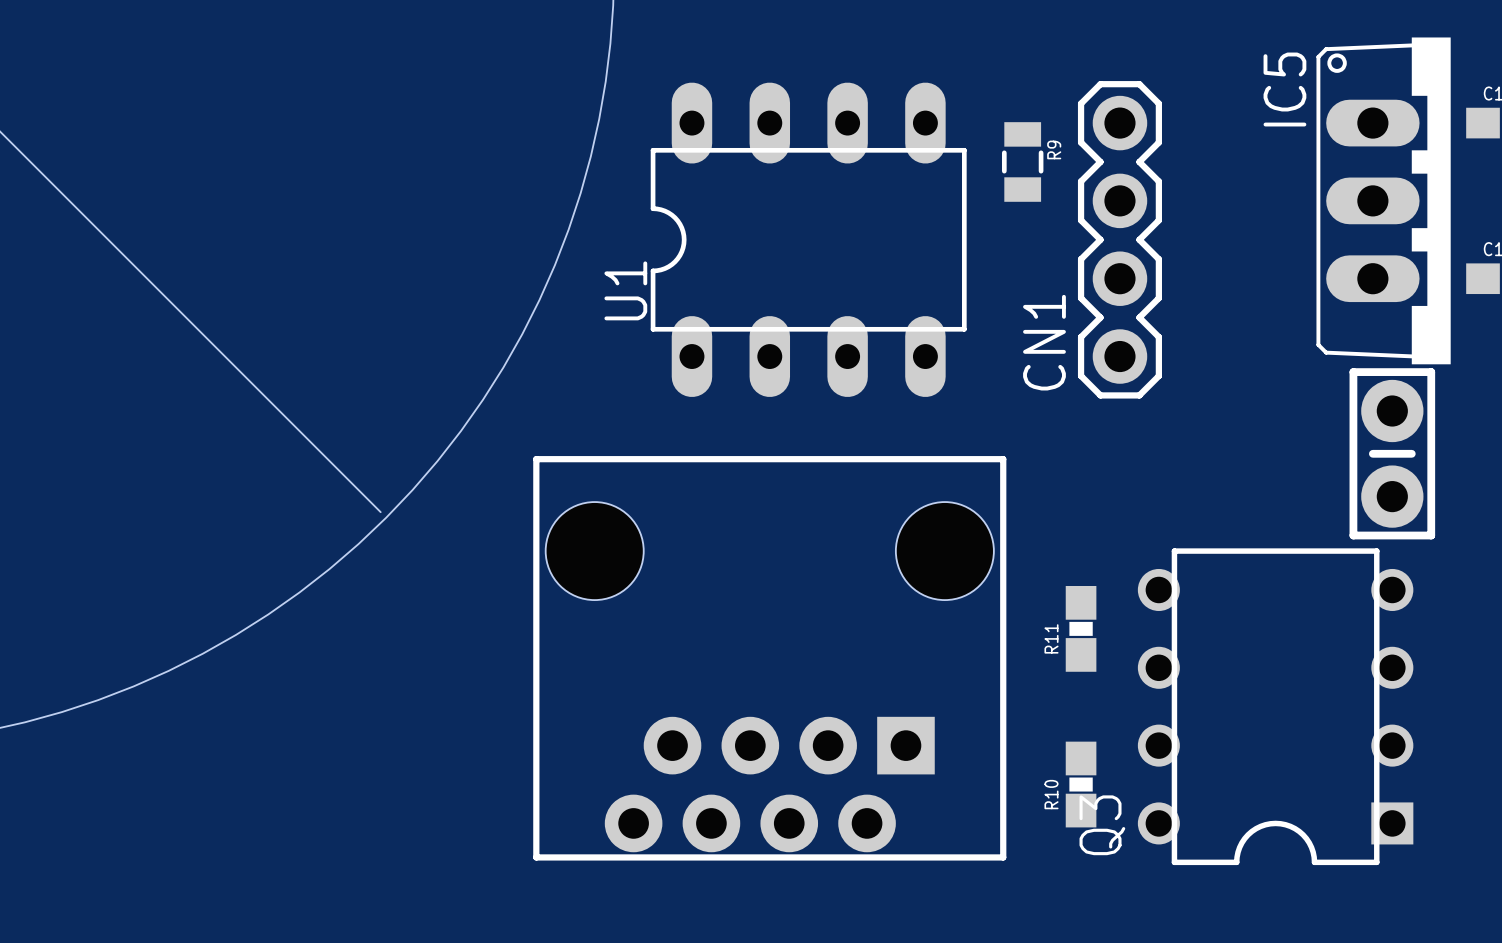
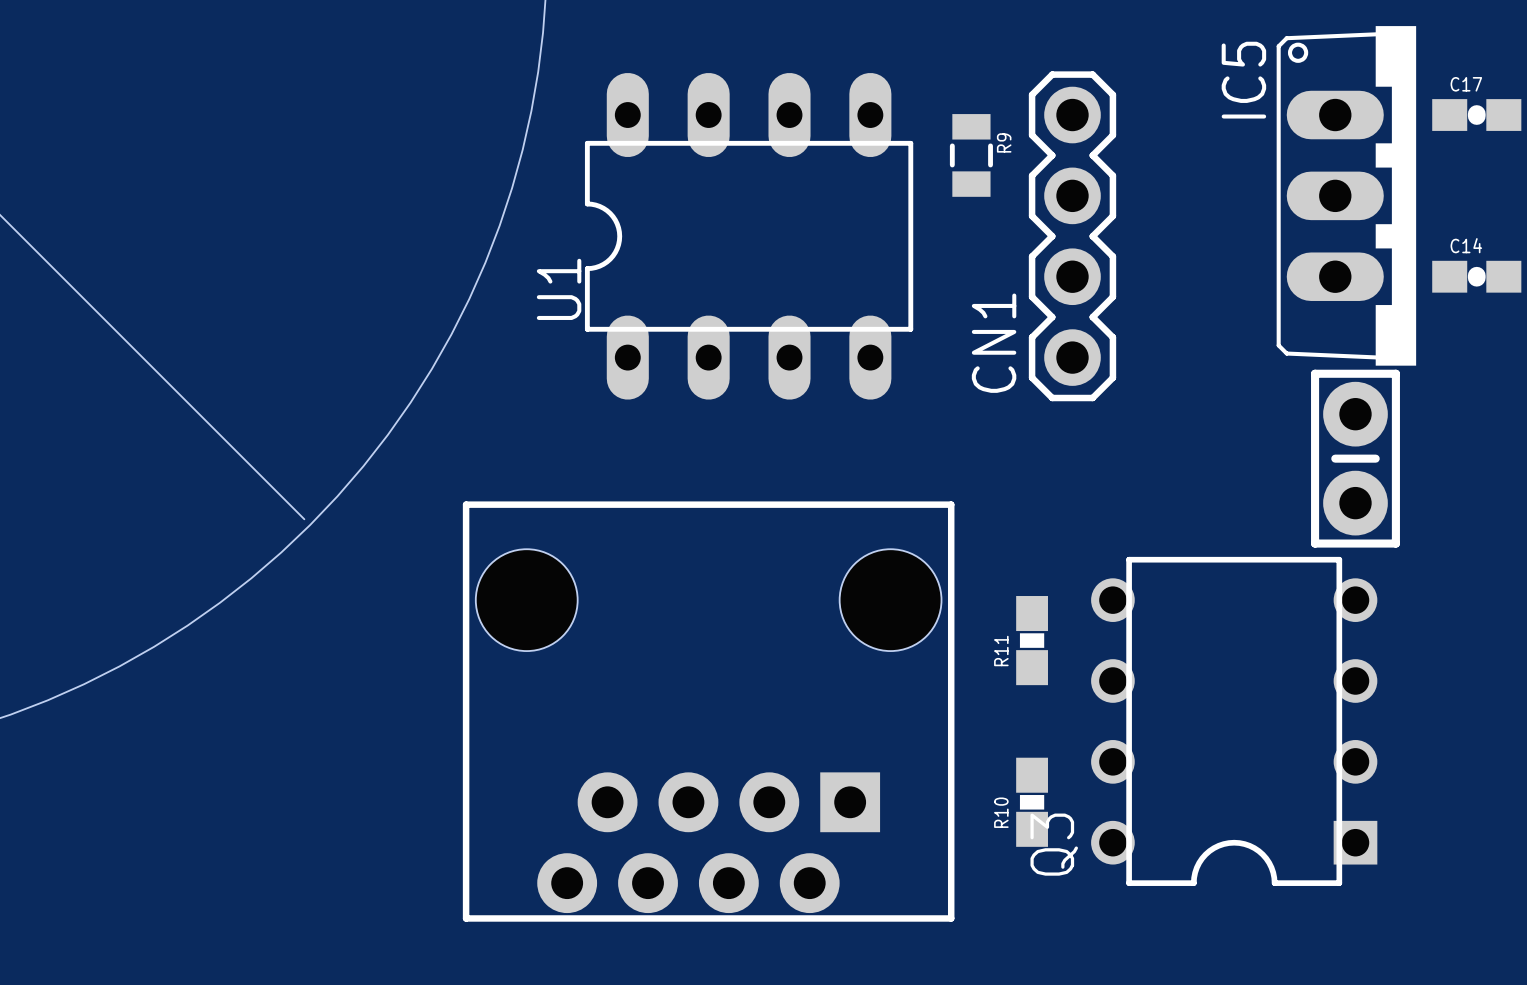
part position: (769, 658) -> (708, 711)

